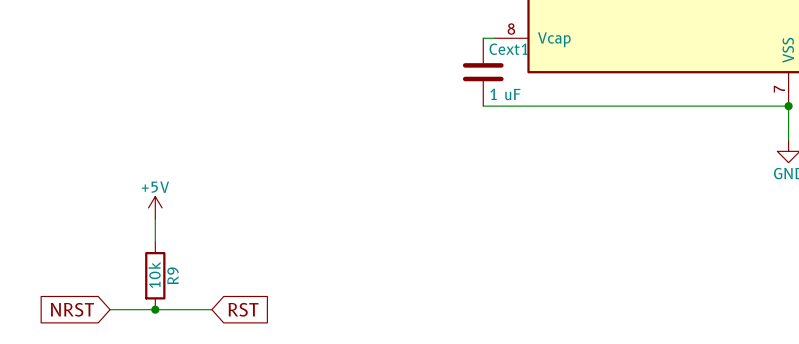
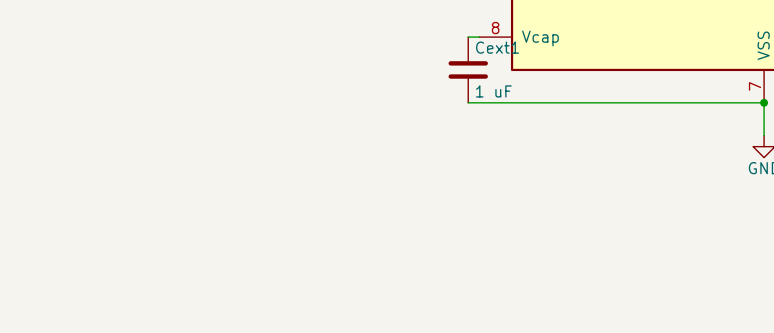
power symbol: +5V (155, 207) -> none
wire: (155, 219) (155, 241) -> none
R9: 10k (155, 275) -> none
global label: NRST (72, 309) -> none
wire: (110, 309) (211, 309) -> none
junction: (155, 309) -> none
global label: RST (243, 309) -> none

